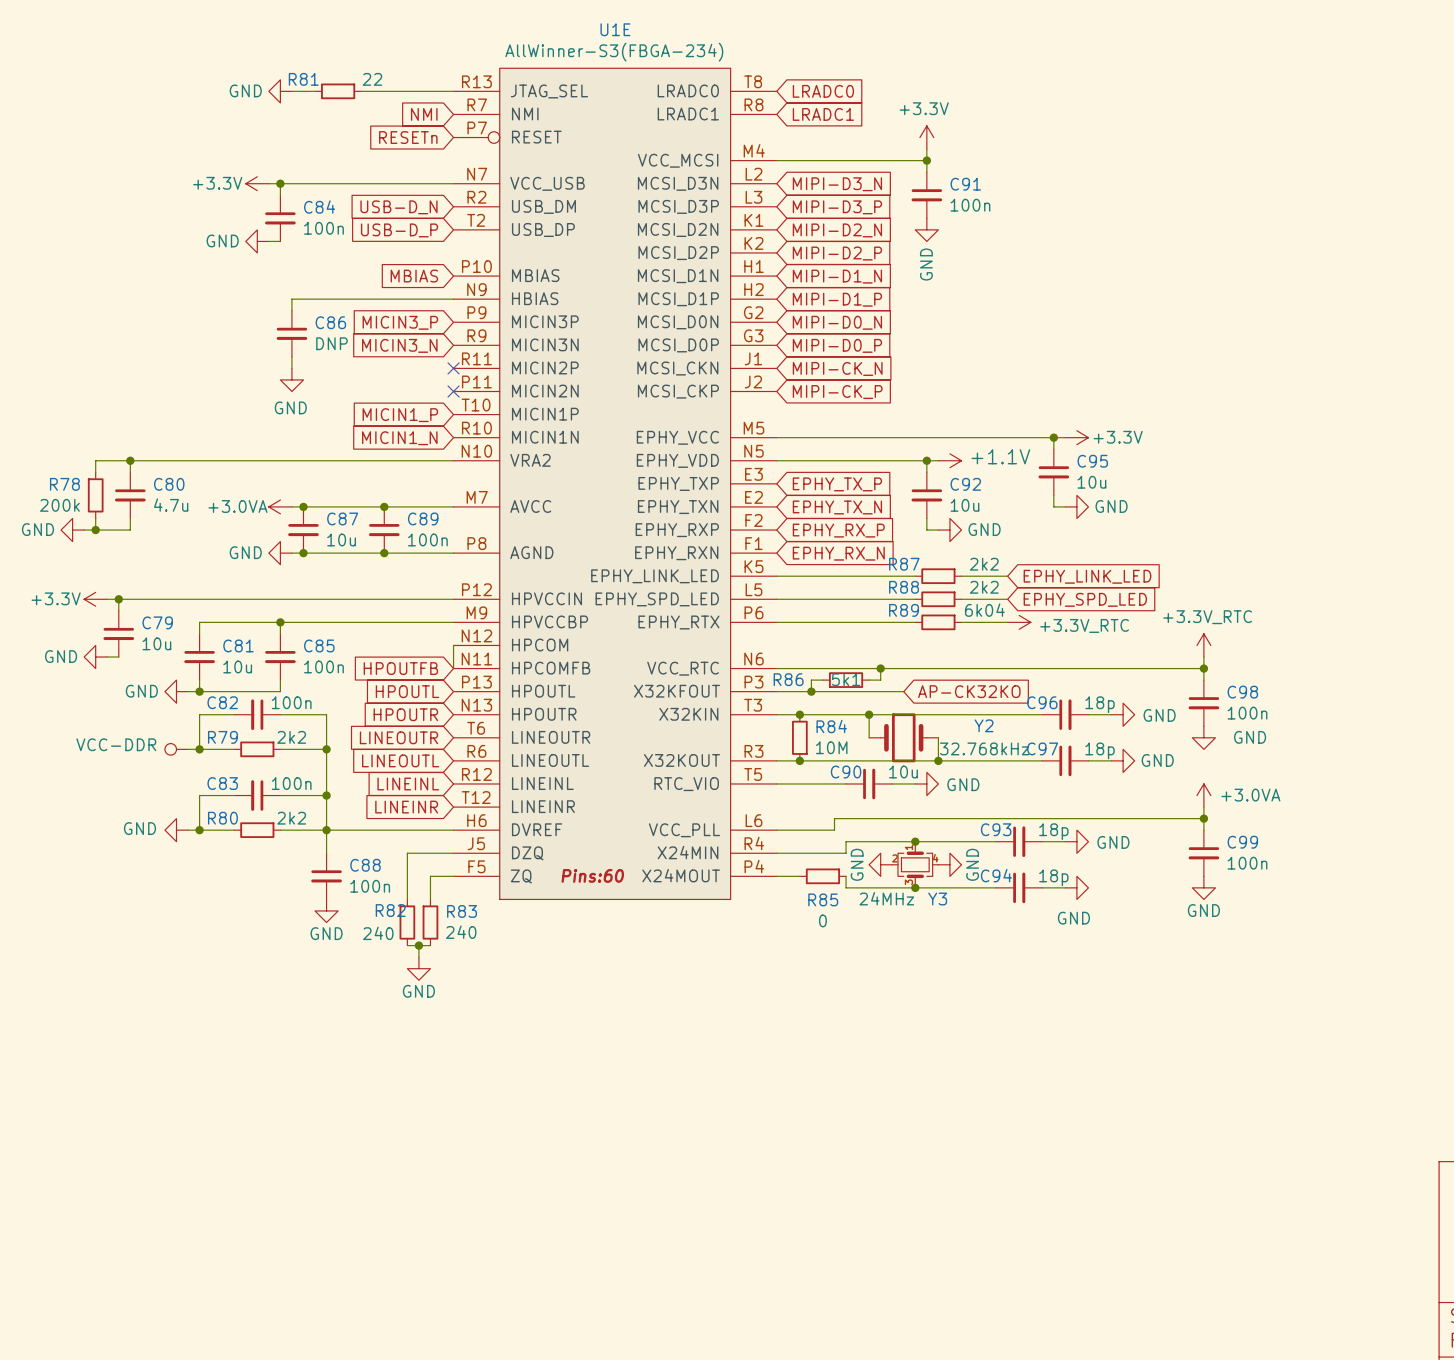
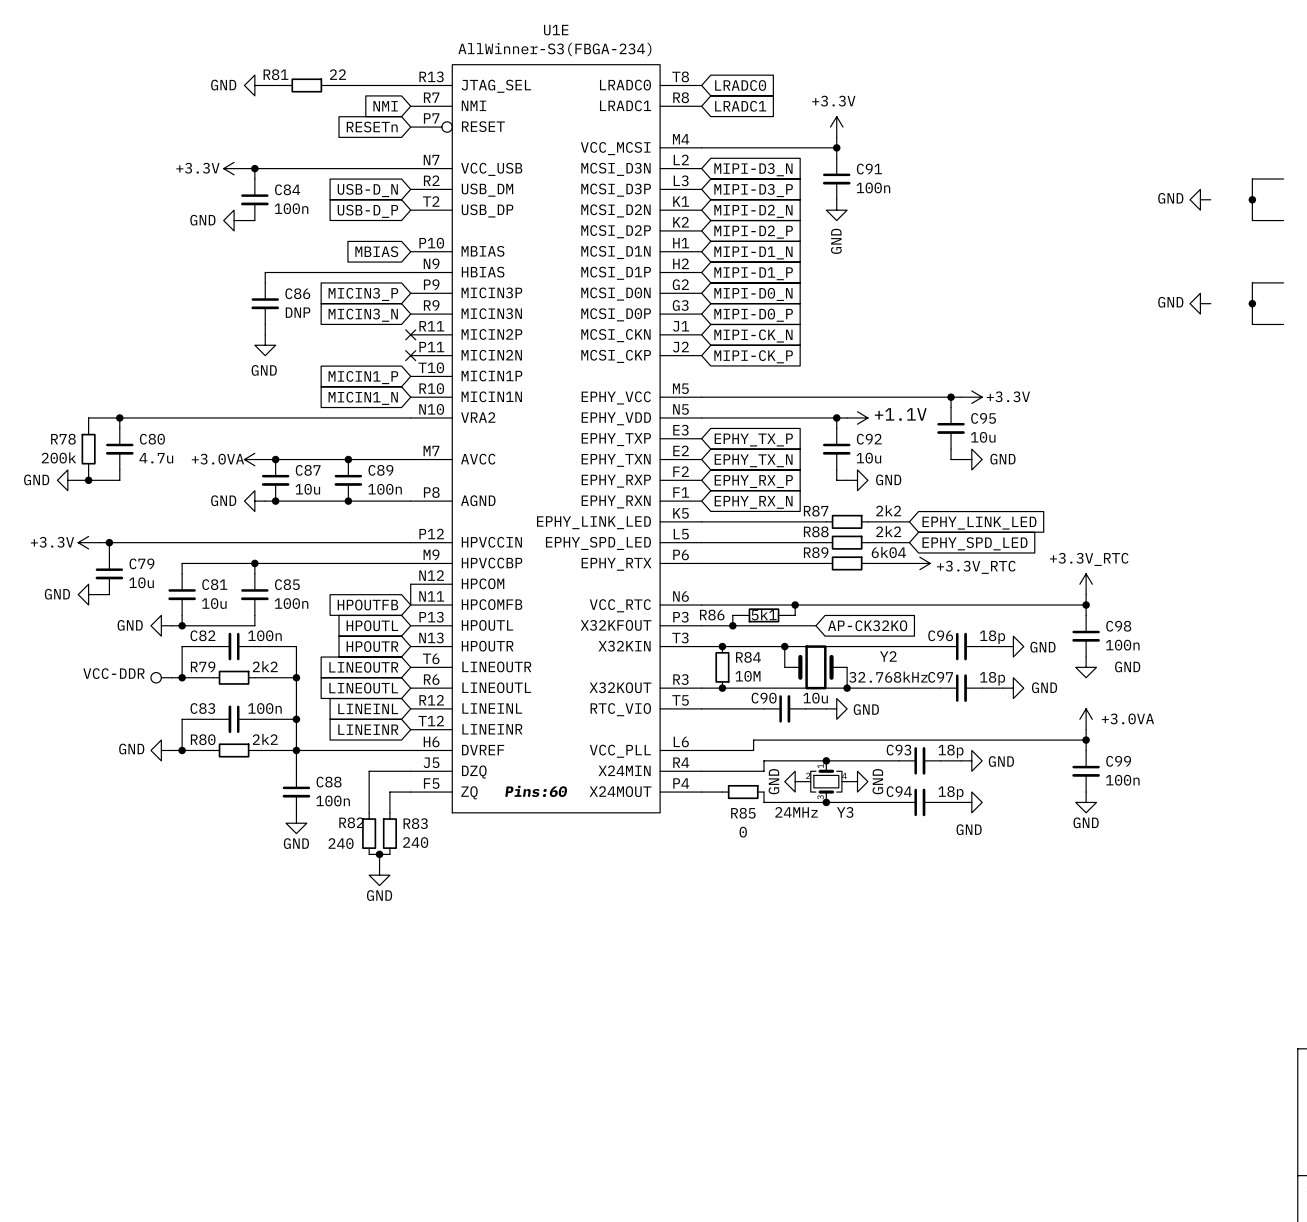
wire: none -> (1283, 179) (1252, 179) (1252, 220) (1283, 220)
power symbol: none -> GND (1200, 199)
junction: none -> (1252, 199)
wire: none -> (1283, 282) (1252, 282) (1252, 324) (1283, 324)
power symbol: none -> GND (1200, 303)
junction: none -> (1252, 303)

